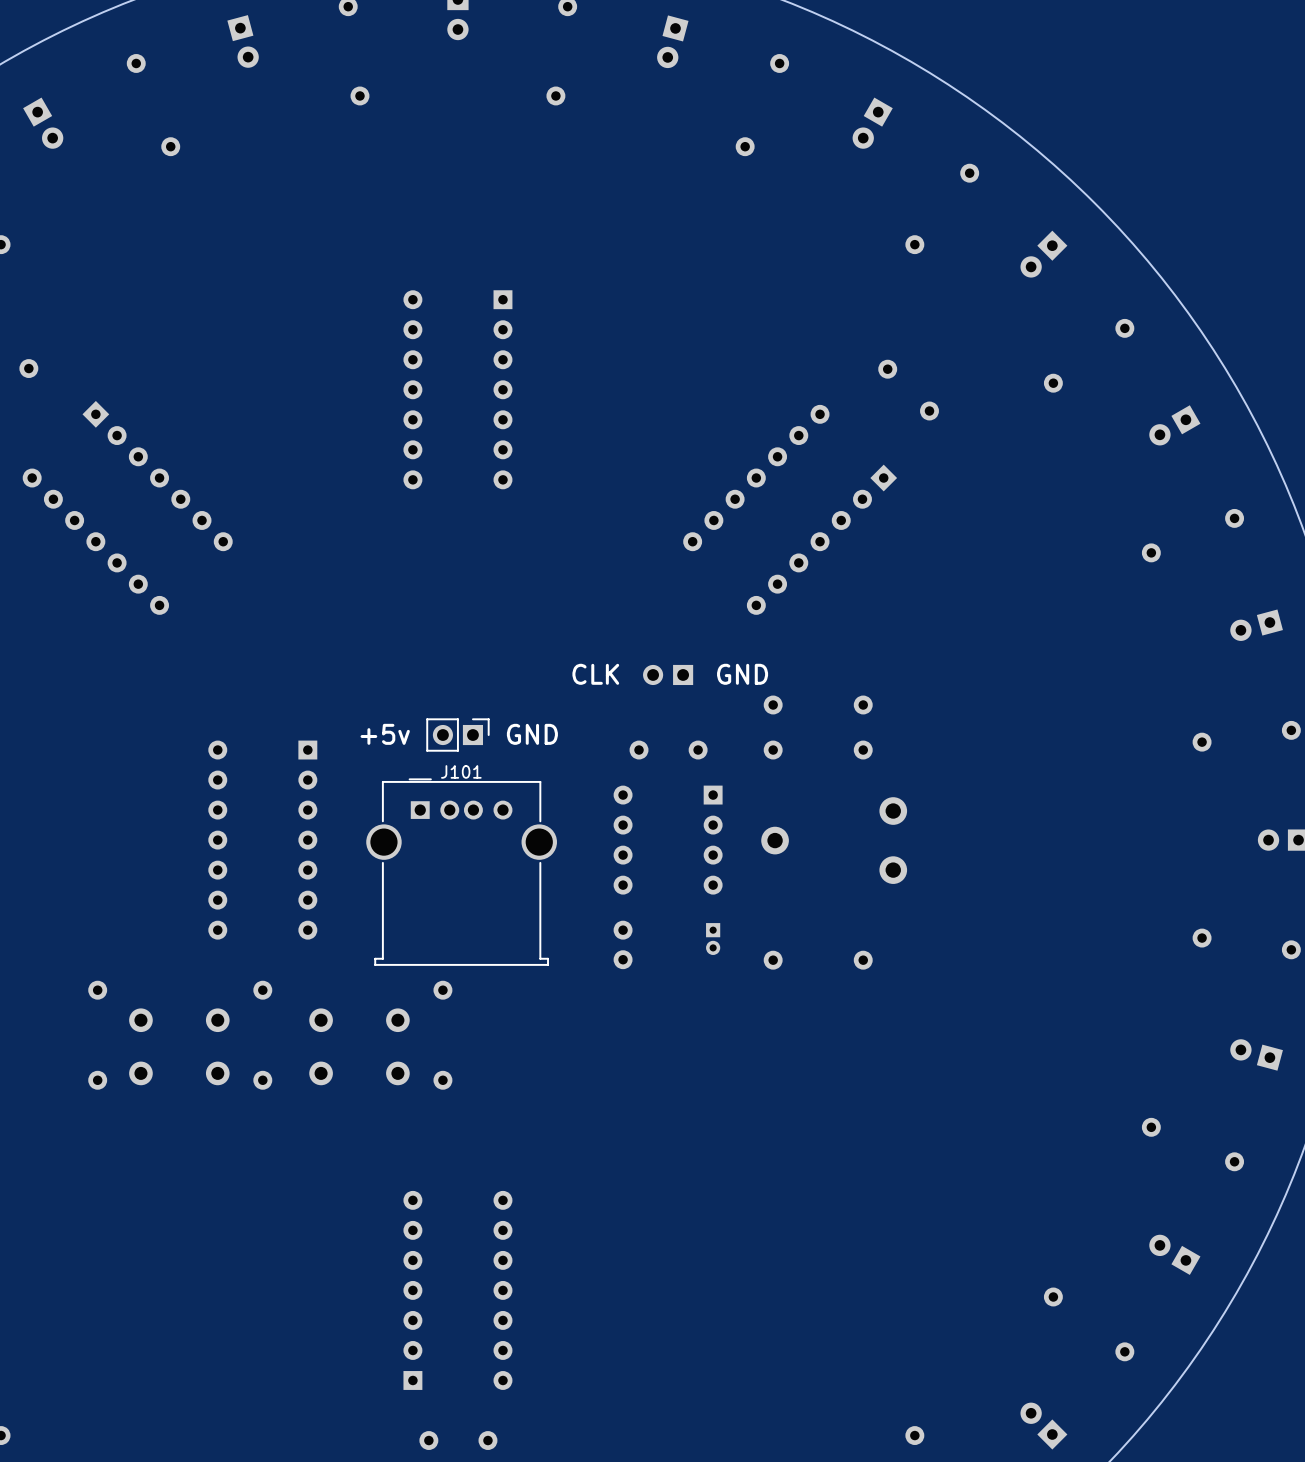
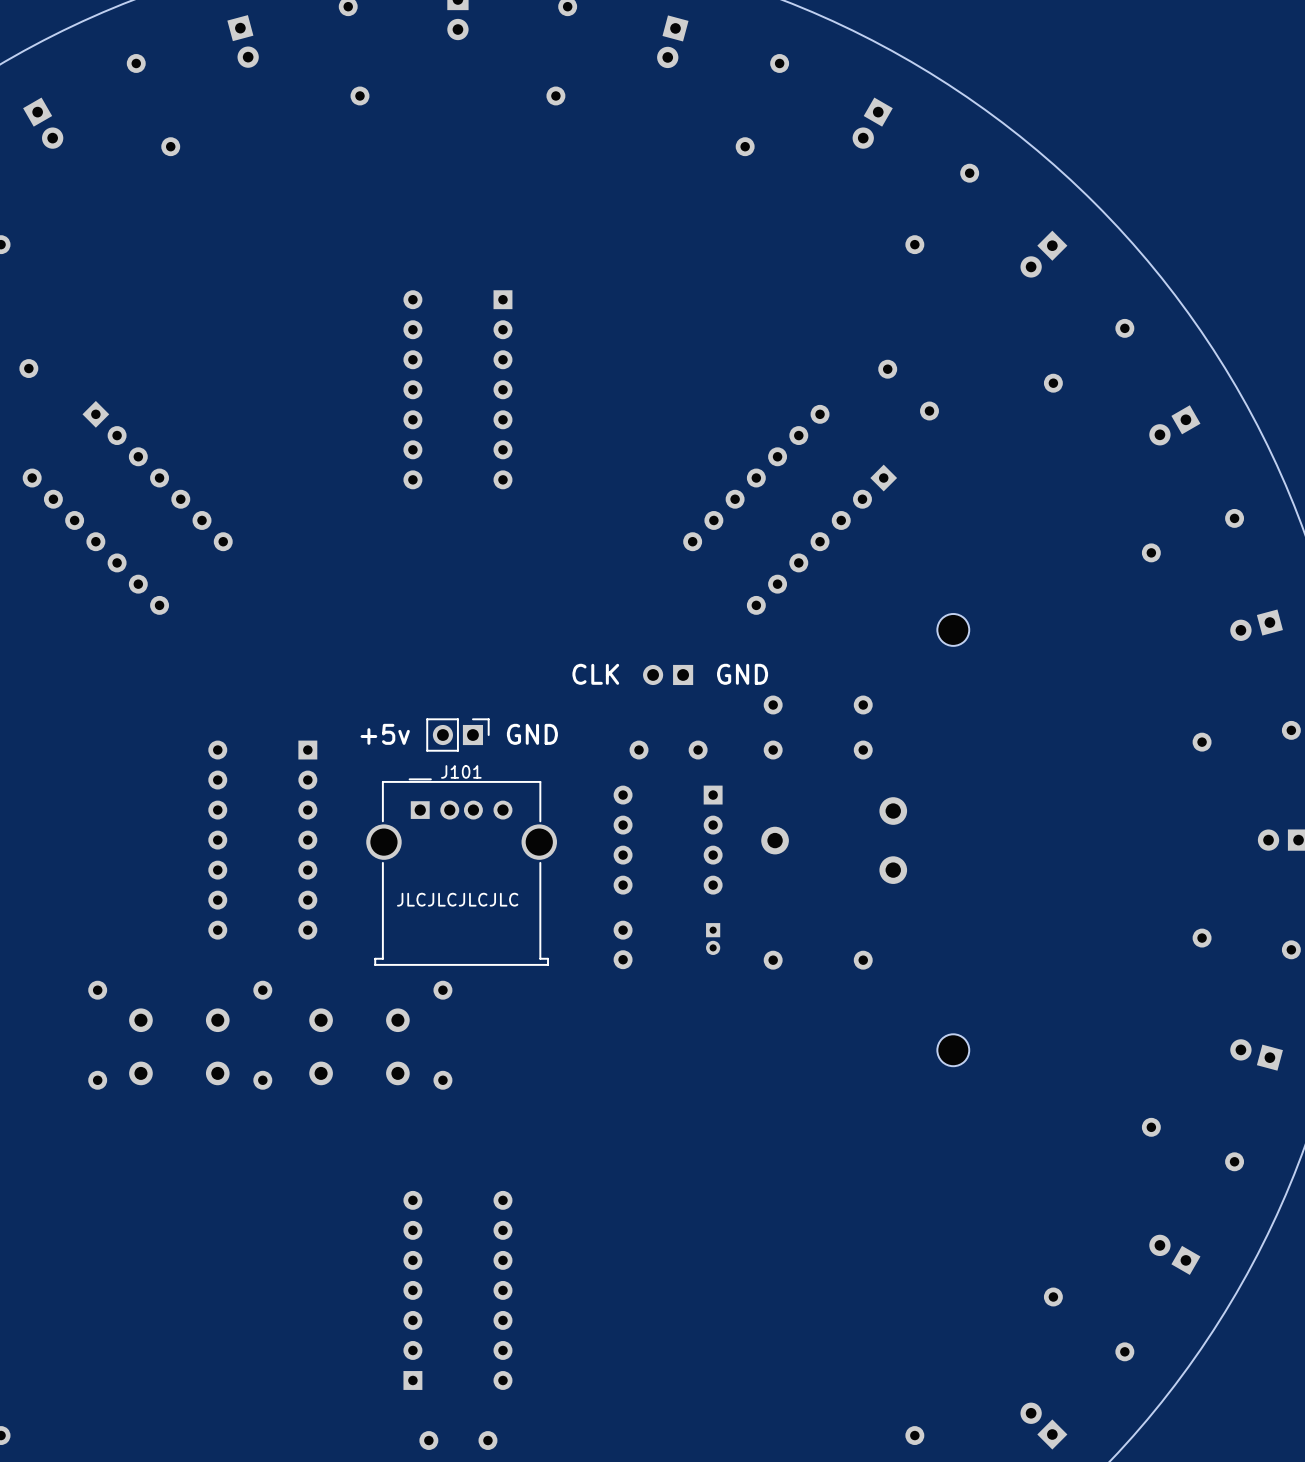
part: none -> (953, 629)
text: none -> JLCJLCJLCJLC (457, 899)
part: none -> (953, 1050)

